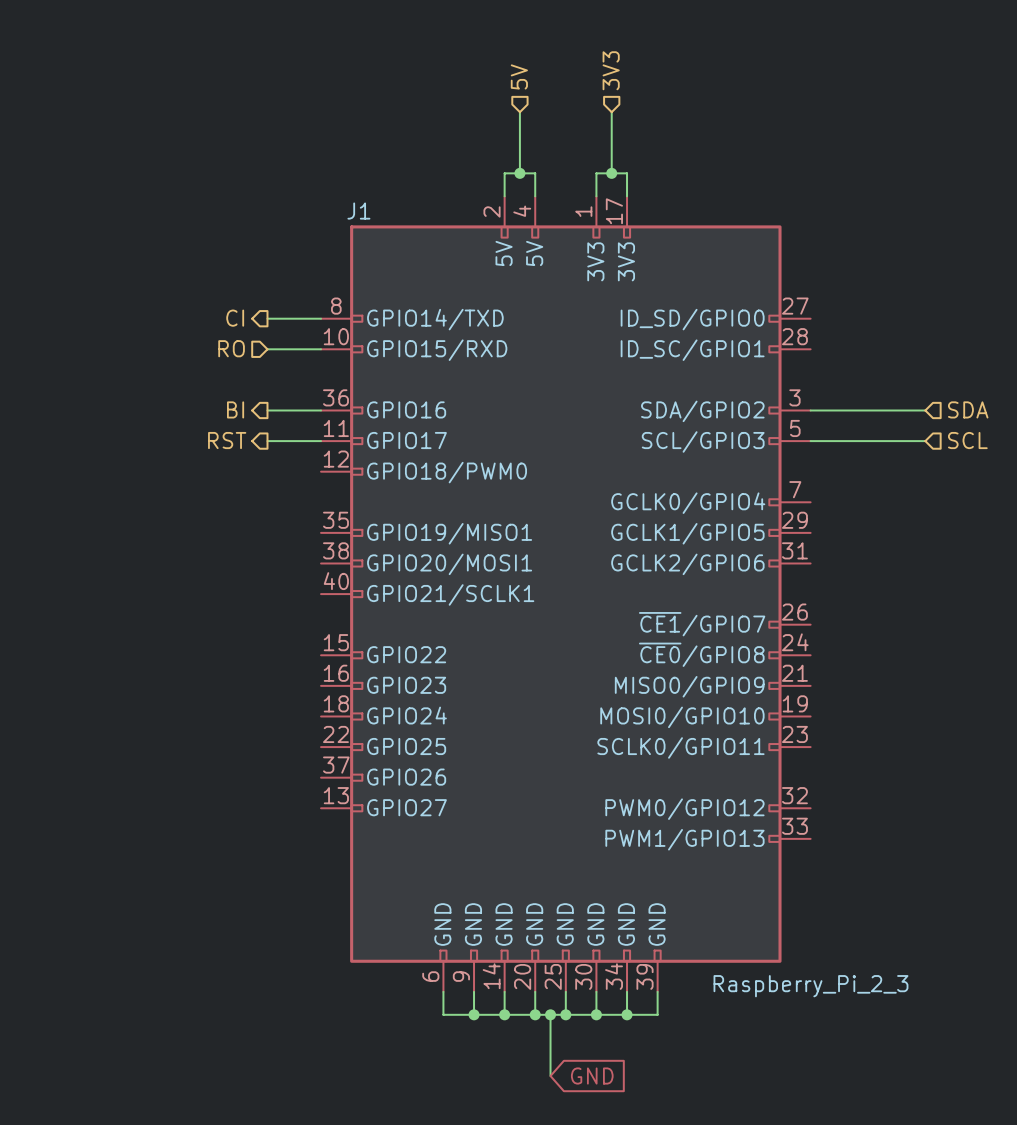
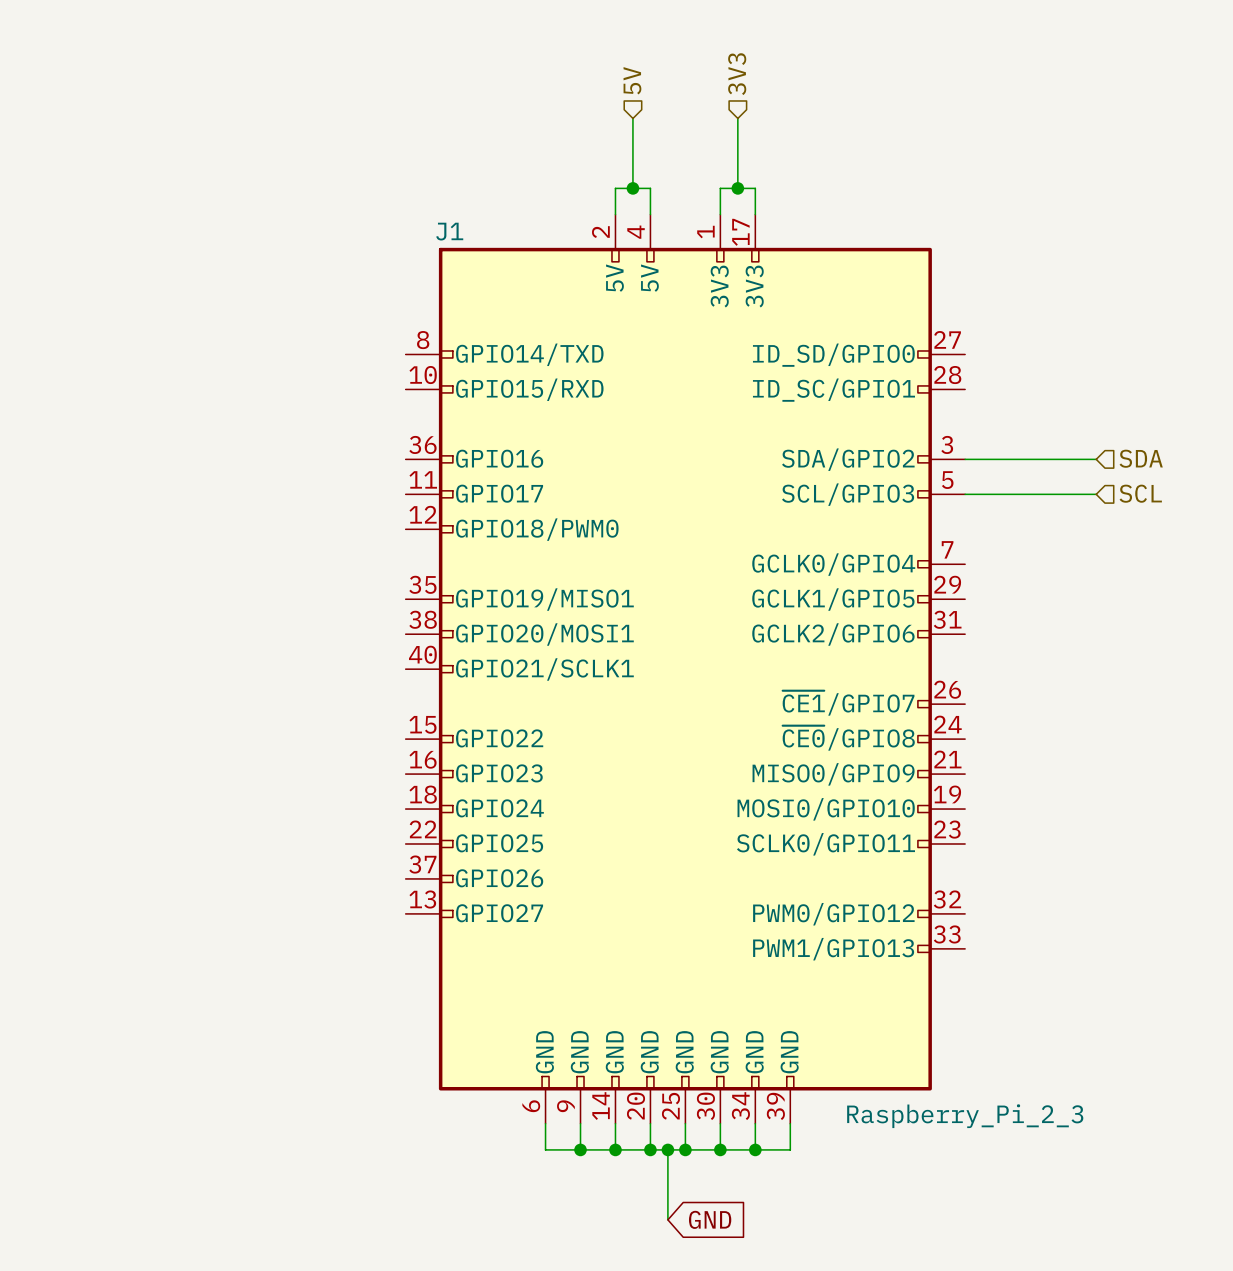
hierarchical label: CI (235, 318) -> none
wire: (267, 318) (321, 318) -> none
hierarchical label: RO (231, 348) -> none
wire: (267, 349) (321, 349) -> none
hierarchical label: BI (235, 409) -> none
wire: (267, 410) (321, 410) -> none
hierarchical label: RST (227, 440) -> none
wire: (267, 441) (321, 441) -> none

